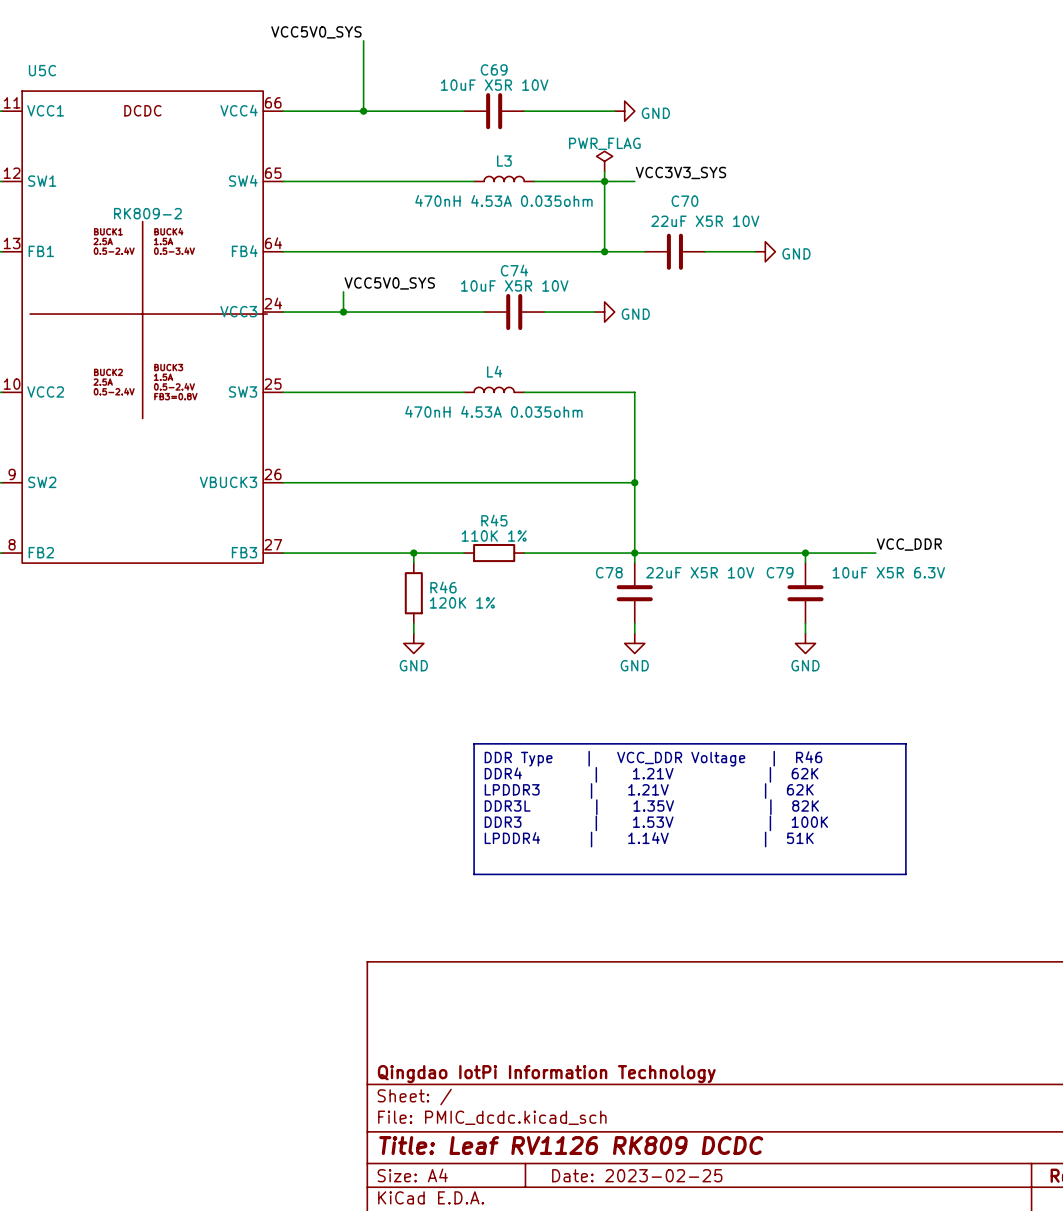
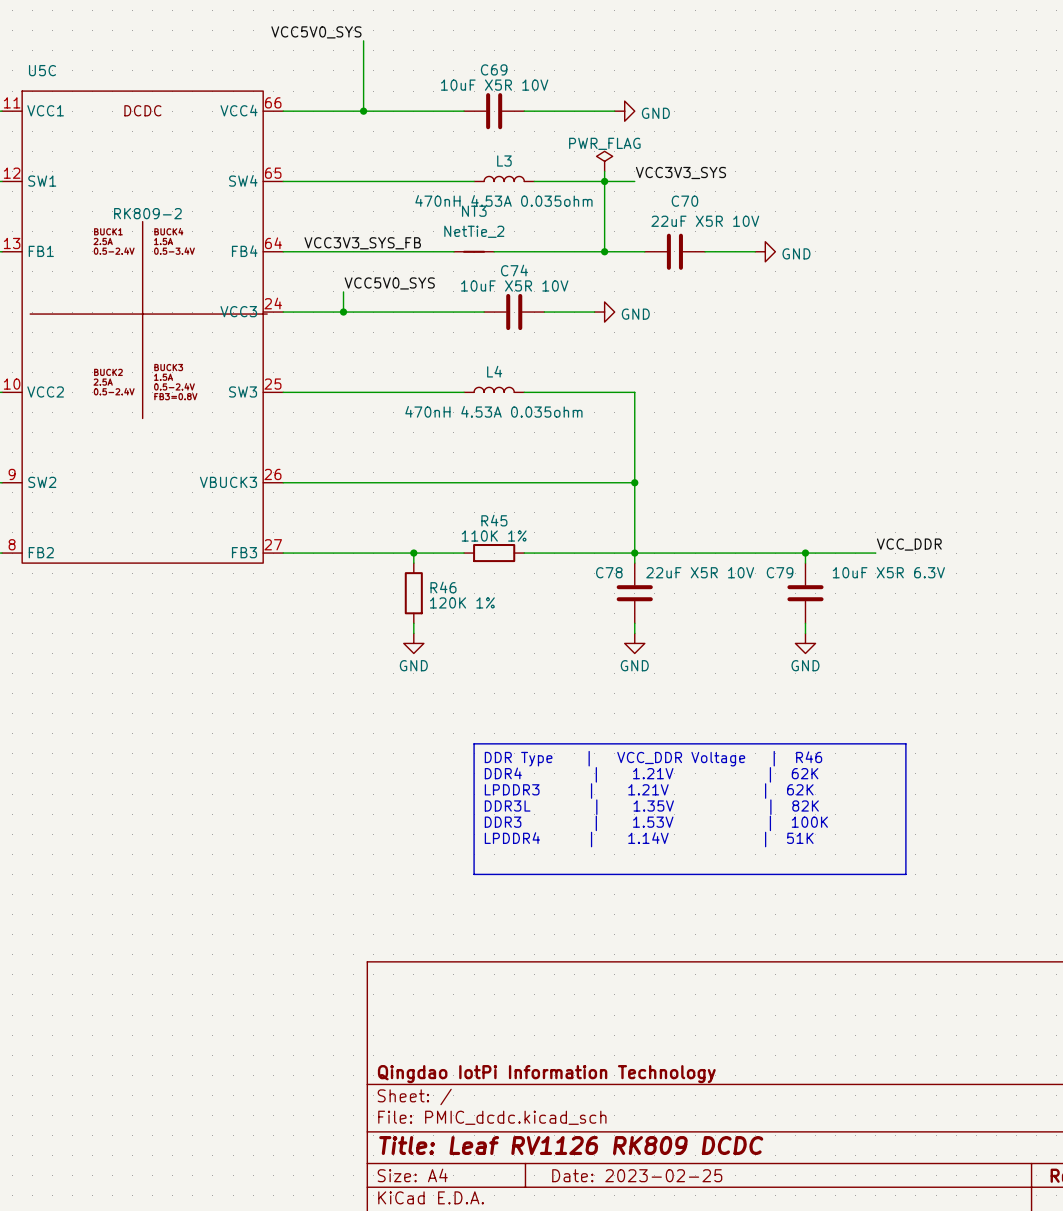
label: none -> VCC3V3_SYS_FB (362, 243)
NT3: none -> NetTie_2 (474, 251)

